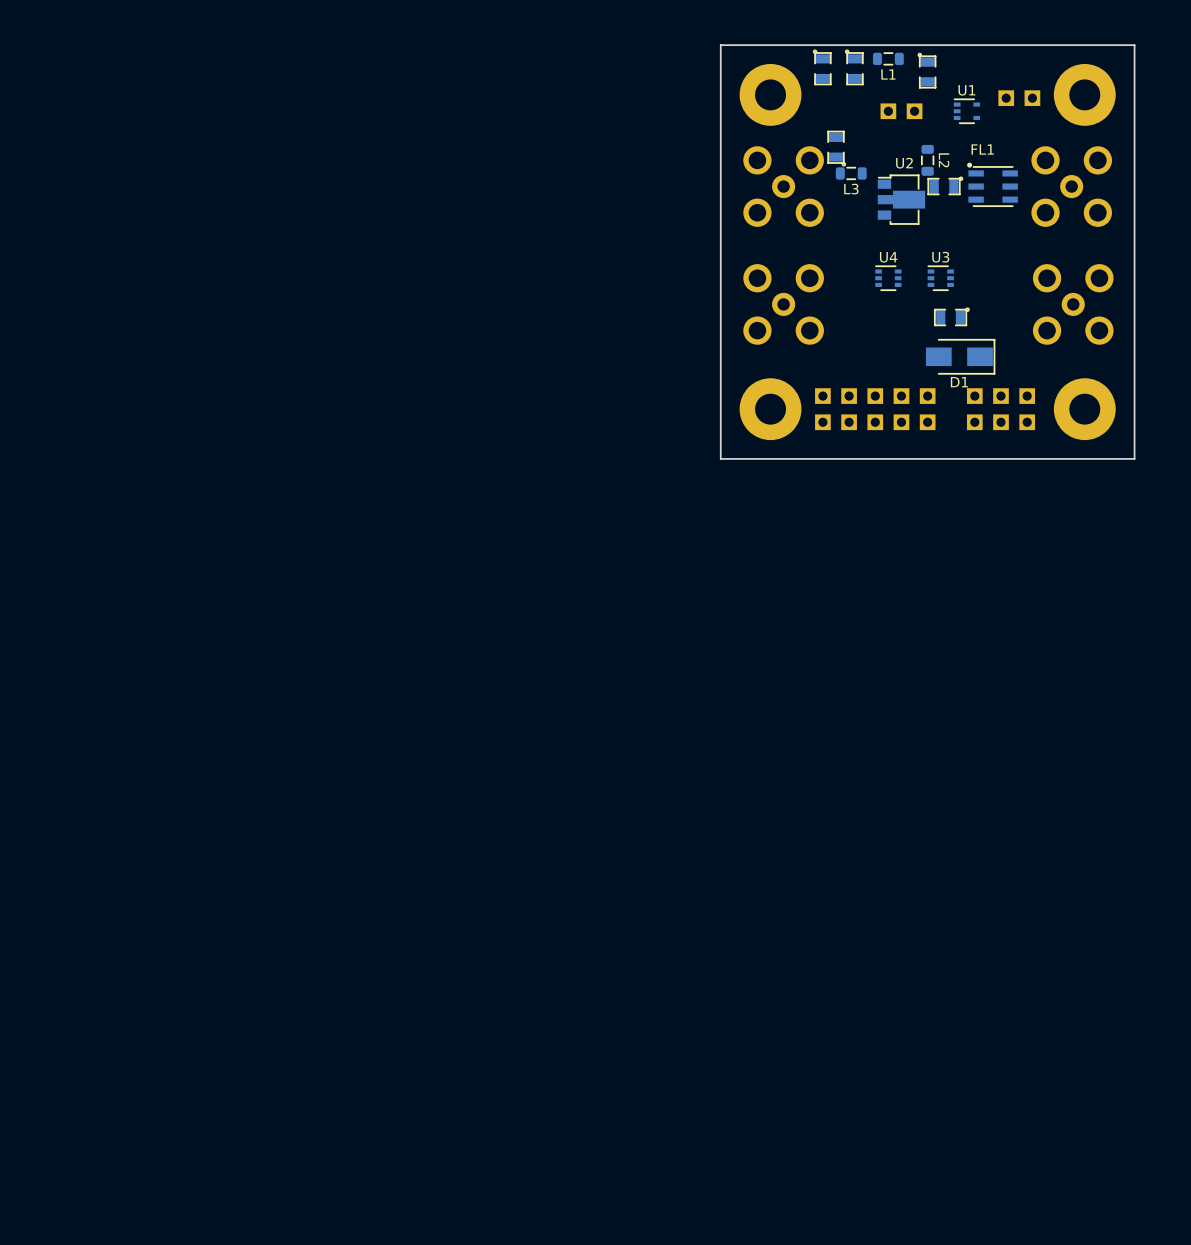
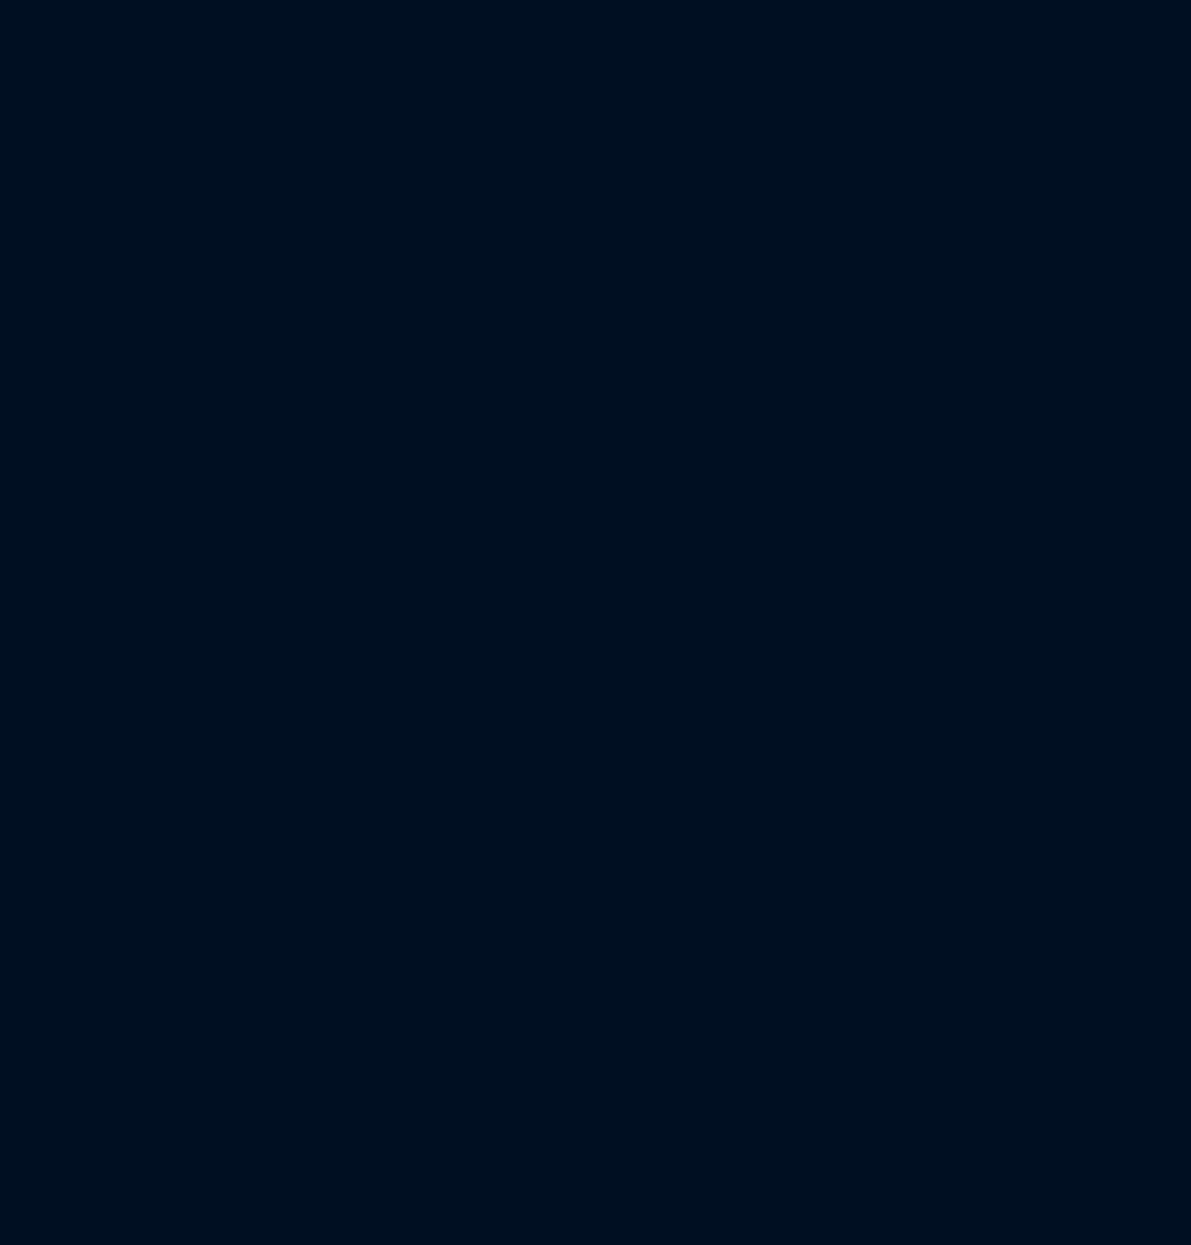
board edge: (1134, 45) (720, 45) (720, 458) (1134, 458) (1134, 45) -> none
L1: (888, 58) -> none
part: (822, 67) -> none
part: (854, 67) -> none
part: (927, 70) -> none
part: (770, 94) -> none
part: (1084, 94) -> none
part: (1019, 98) -> none
part: (901, 111) -> none
U1: (966, 111) -> none
part: (836, 148) -> none
L2: (927, 160) -> none
L3: (851, 173) -> none
FL1: (992, 184) -> none
part: (945, 185) -> none
part: (783, 186) -> none
part: (1071, 186) -> none
U2: (901, 199) -> none
U4: (888, 278) -> none
U3: (940, 278) -> none
part: (783, 304) -> none
part: (1073, 304) -> none
part: (951, 316) -> none
D1: (960, 356) -> none
part: (770, 409) -> none
part: (822, 409) -> none
part: (849, 409) -> none
part: (875, 409) -> none
part: (901, 409) -> none
part: (927, 409) -> none
part: (1000, 409) -> none
part: (1084, 409) -> none

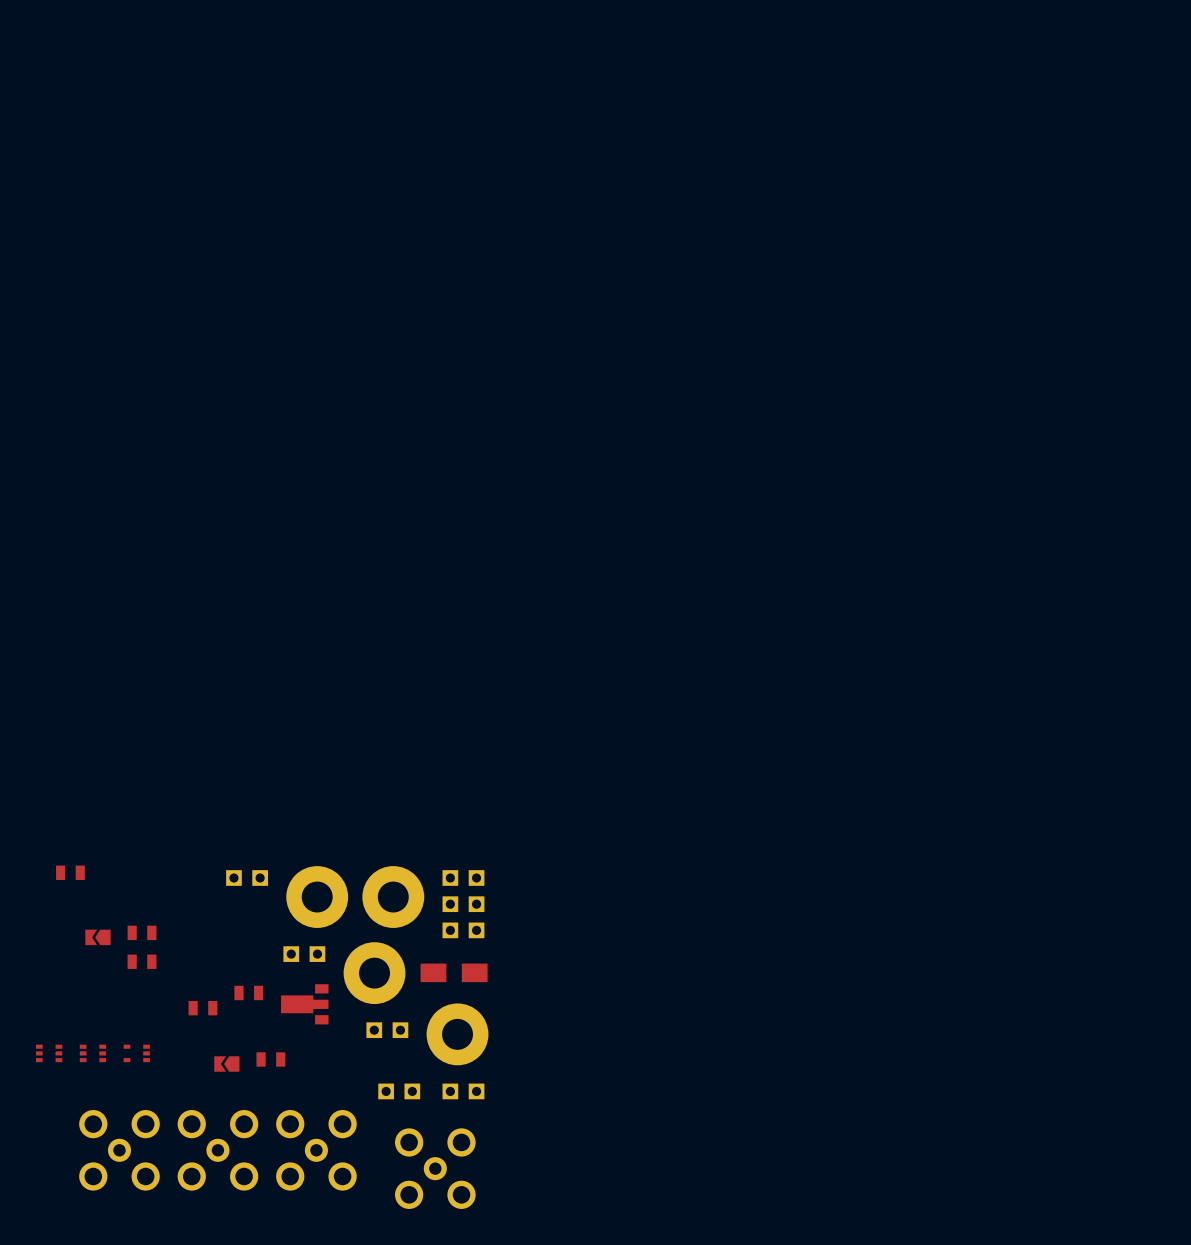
part: none -> (70, 872)
part: none -> (247, 878)
part: none -> (317, 897)
part: none -> (393, 897)
part: none -> (463, 904)
part: none -> (142, 932)
part: none -> (97, 937)
part: none -> (304, 954)
part: none -> (142, 961)
part: none -> (454, 972)
part: none -> (374, 973)
part: none -> (248, 992)
part: none -> (304, 1004)
part: none -> (202, 1008)
part: none -> (387, 1030)
part: none -> (457, 1034)
part: none -> (49, 1053)
part: none -> (92, 1053)
part: none -> (136, 1053)
part: none -> (270, 1059)
part: none -> (226, 1064)
part: none -> (399, 1091)
part: none -> (463, 1091)
part: none -> (119, 1150)
part: none -> (217, 1150)
part: none -> (316, 1150)
part: none -> (435, 1168)

